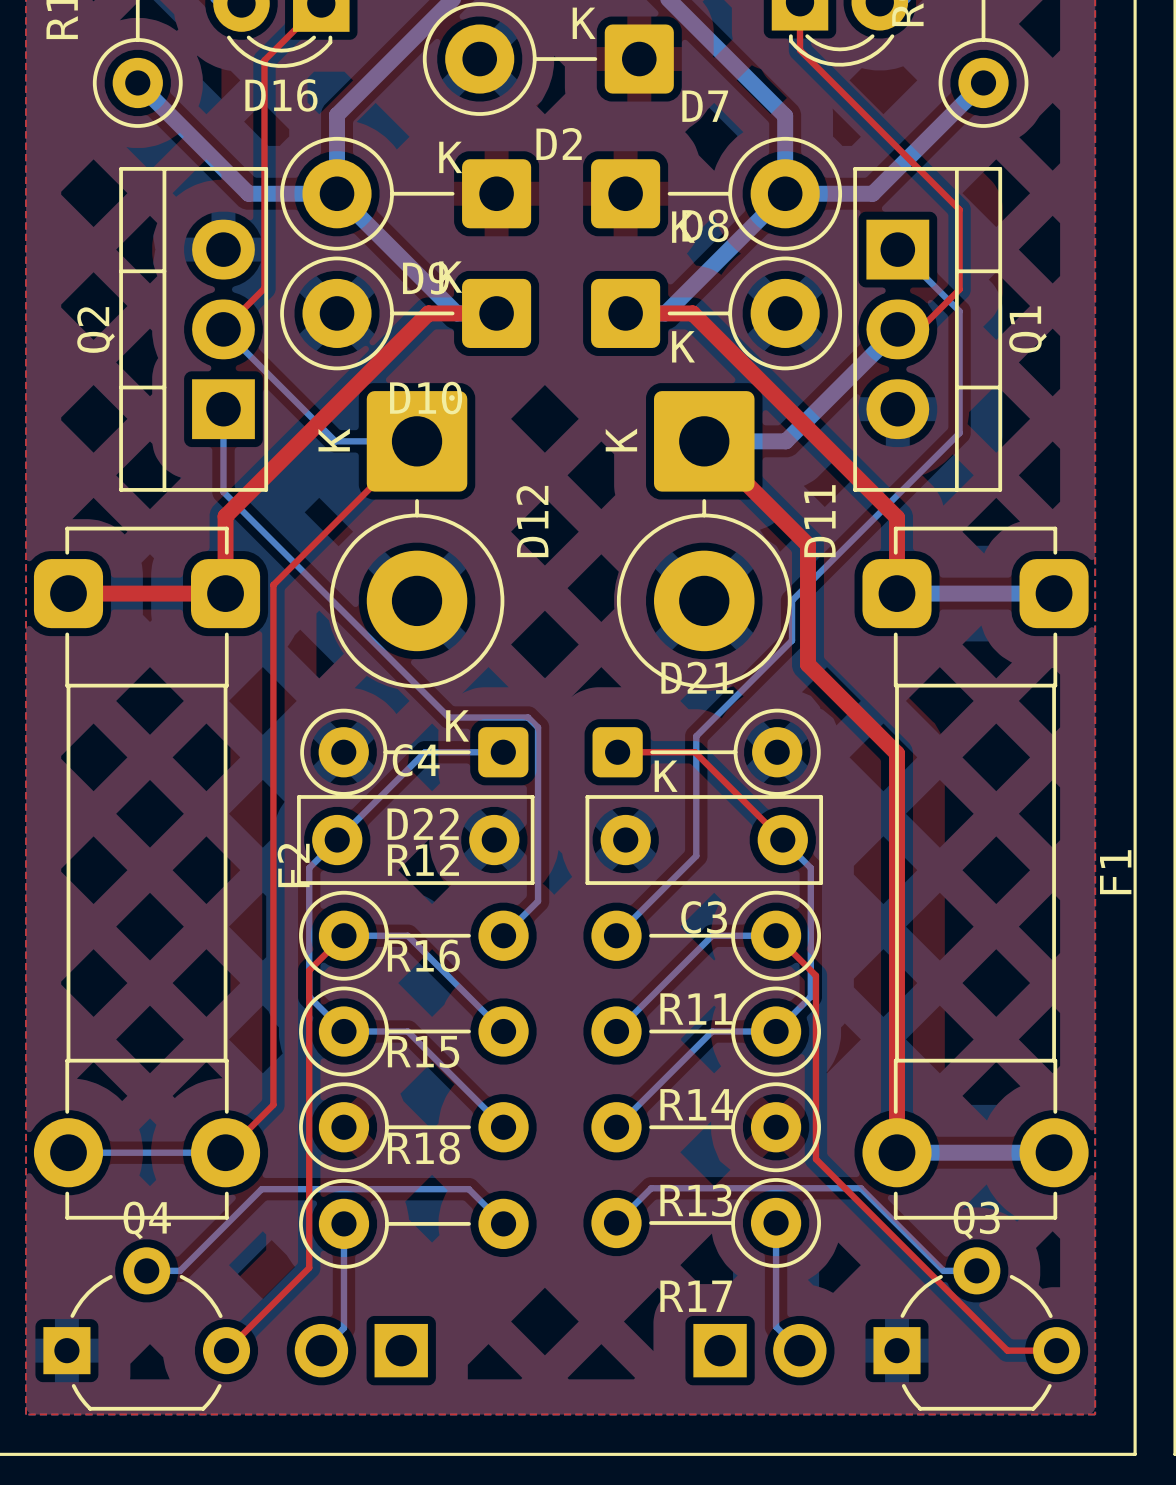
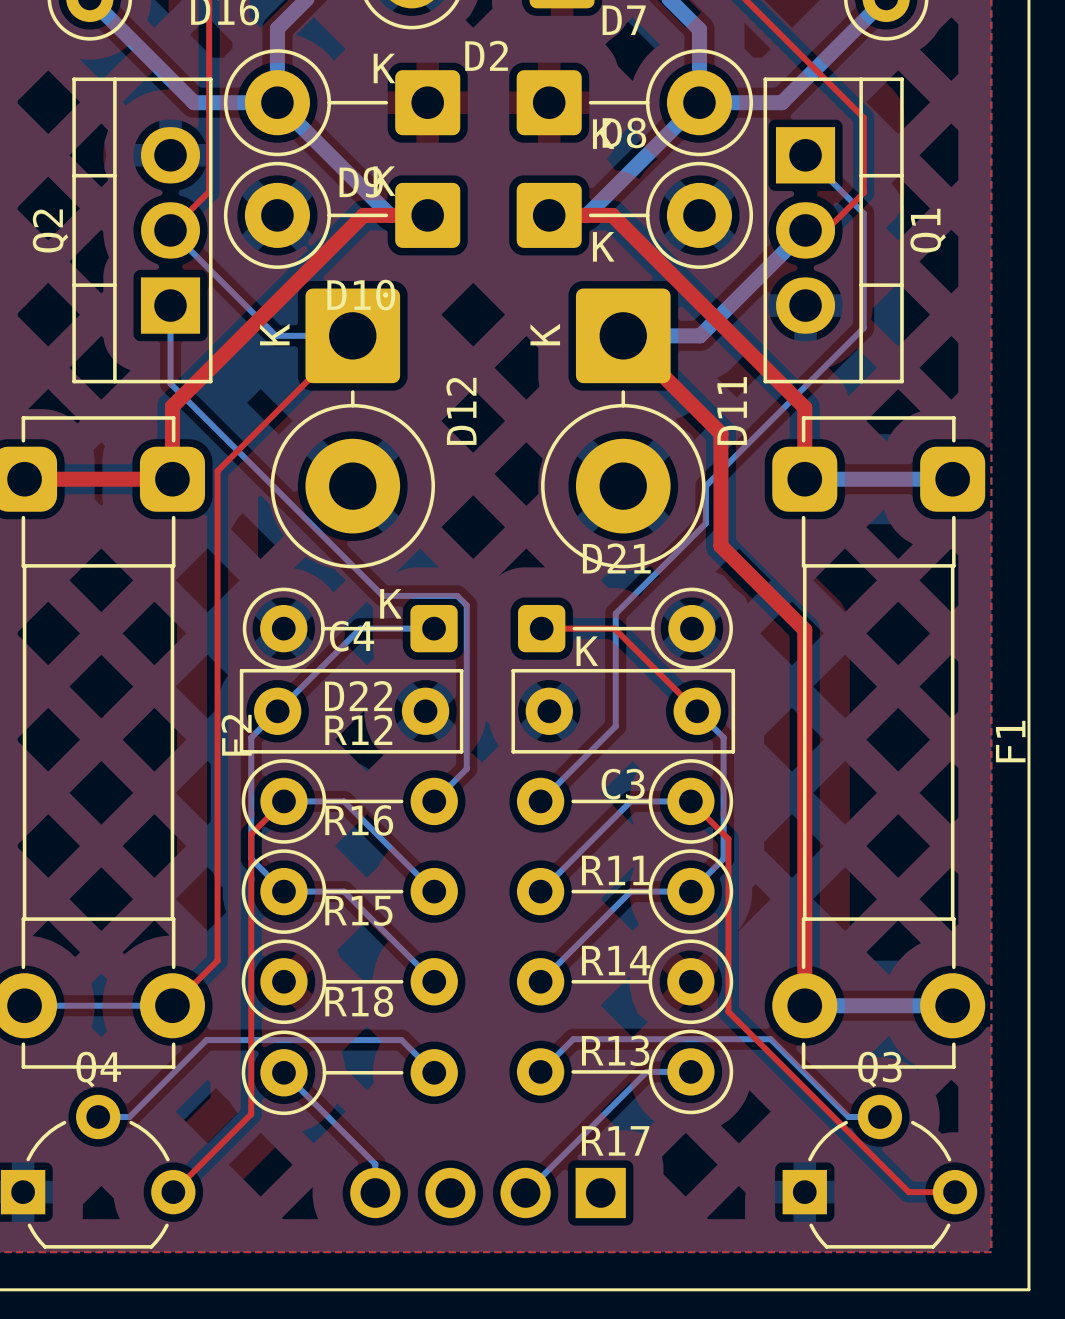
bottom track: (776, 1222) (776, 1326) (799, 1350) -> (690, 1071) (646, 1071) (525, 1192)
bottom track: (343, 1223) (343, 1328) (321, 1350) -> (283, 1072) (375, 1164) (375, 1192)
part: (361, 1350) -> none
part: (759, 1350) -> none
part: none -> (488, 1192)

